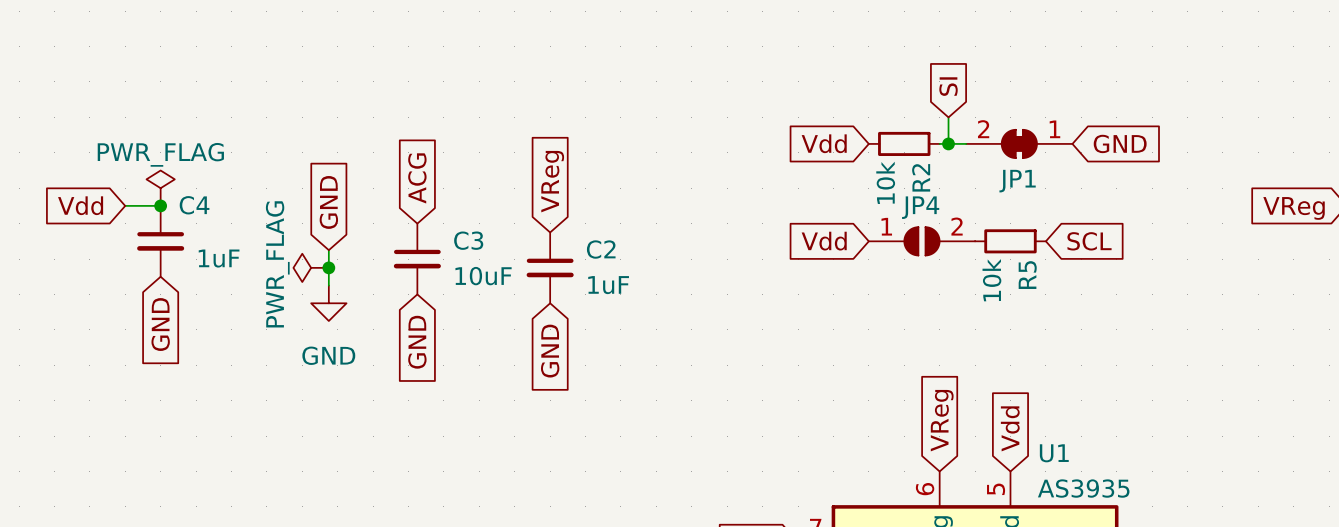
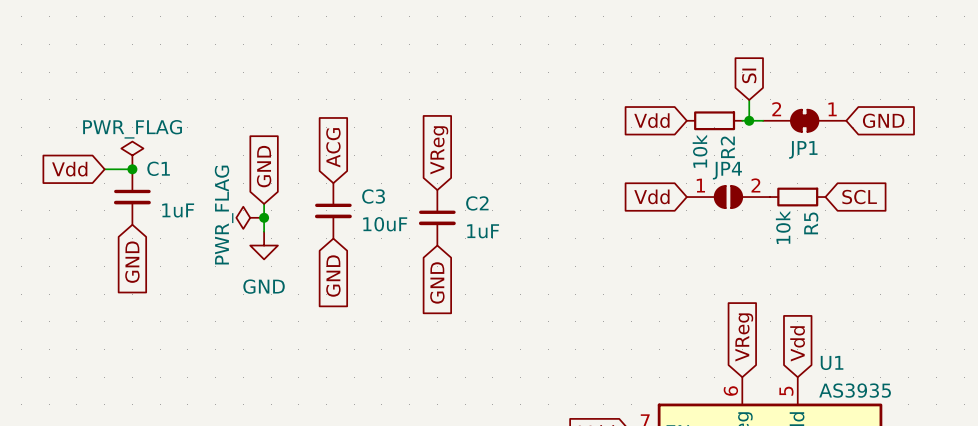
C4 name: C4 (194, 205) -> C1 (158, 168)

